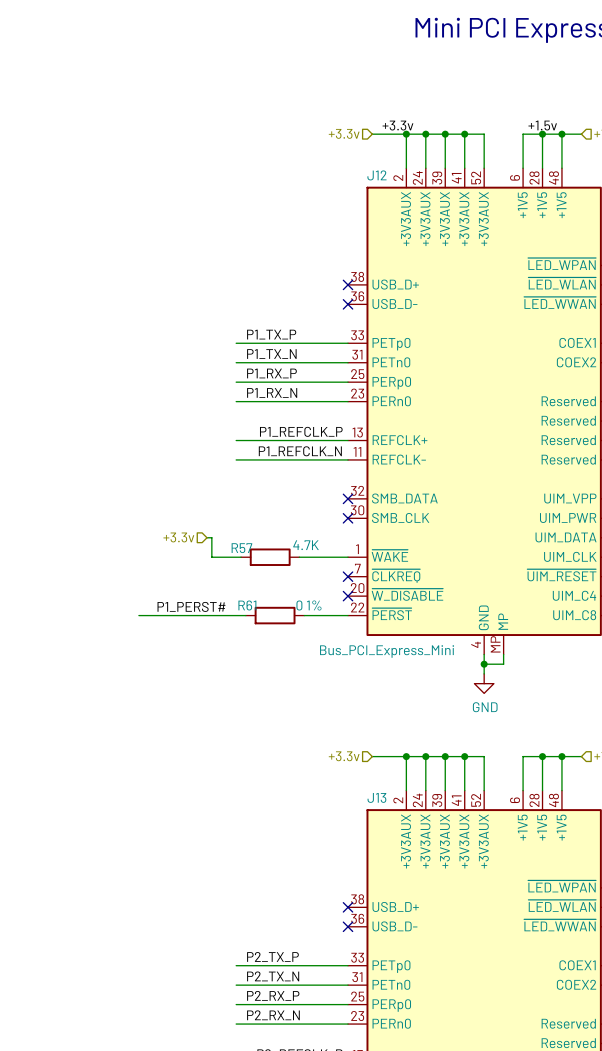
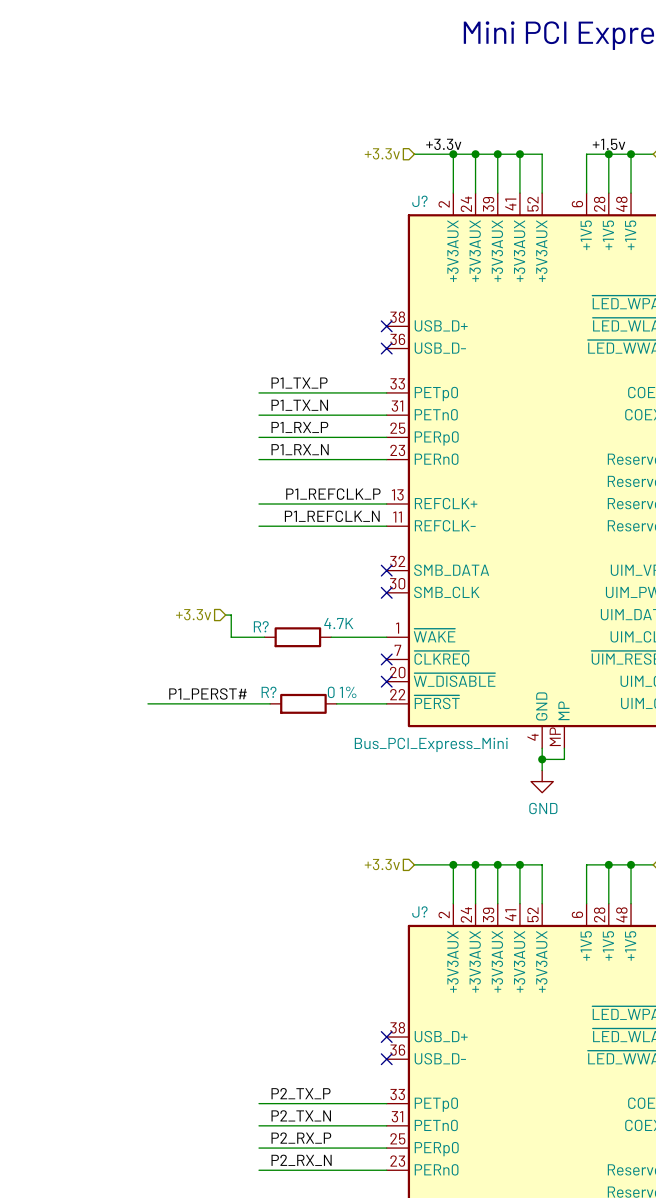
J12 name: J12 (376, 175) -> J? (419, 201)
R57 name: R57 (241, 548) -> R? (261, 626)
R61 name: R61 (247, 605) -> R? (269, 692)
J13 name: J13 (376, 797) -> J? (419, 911)

